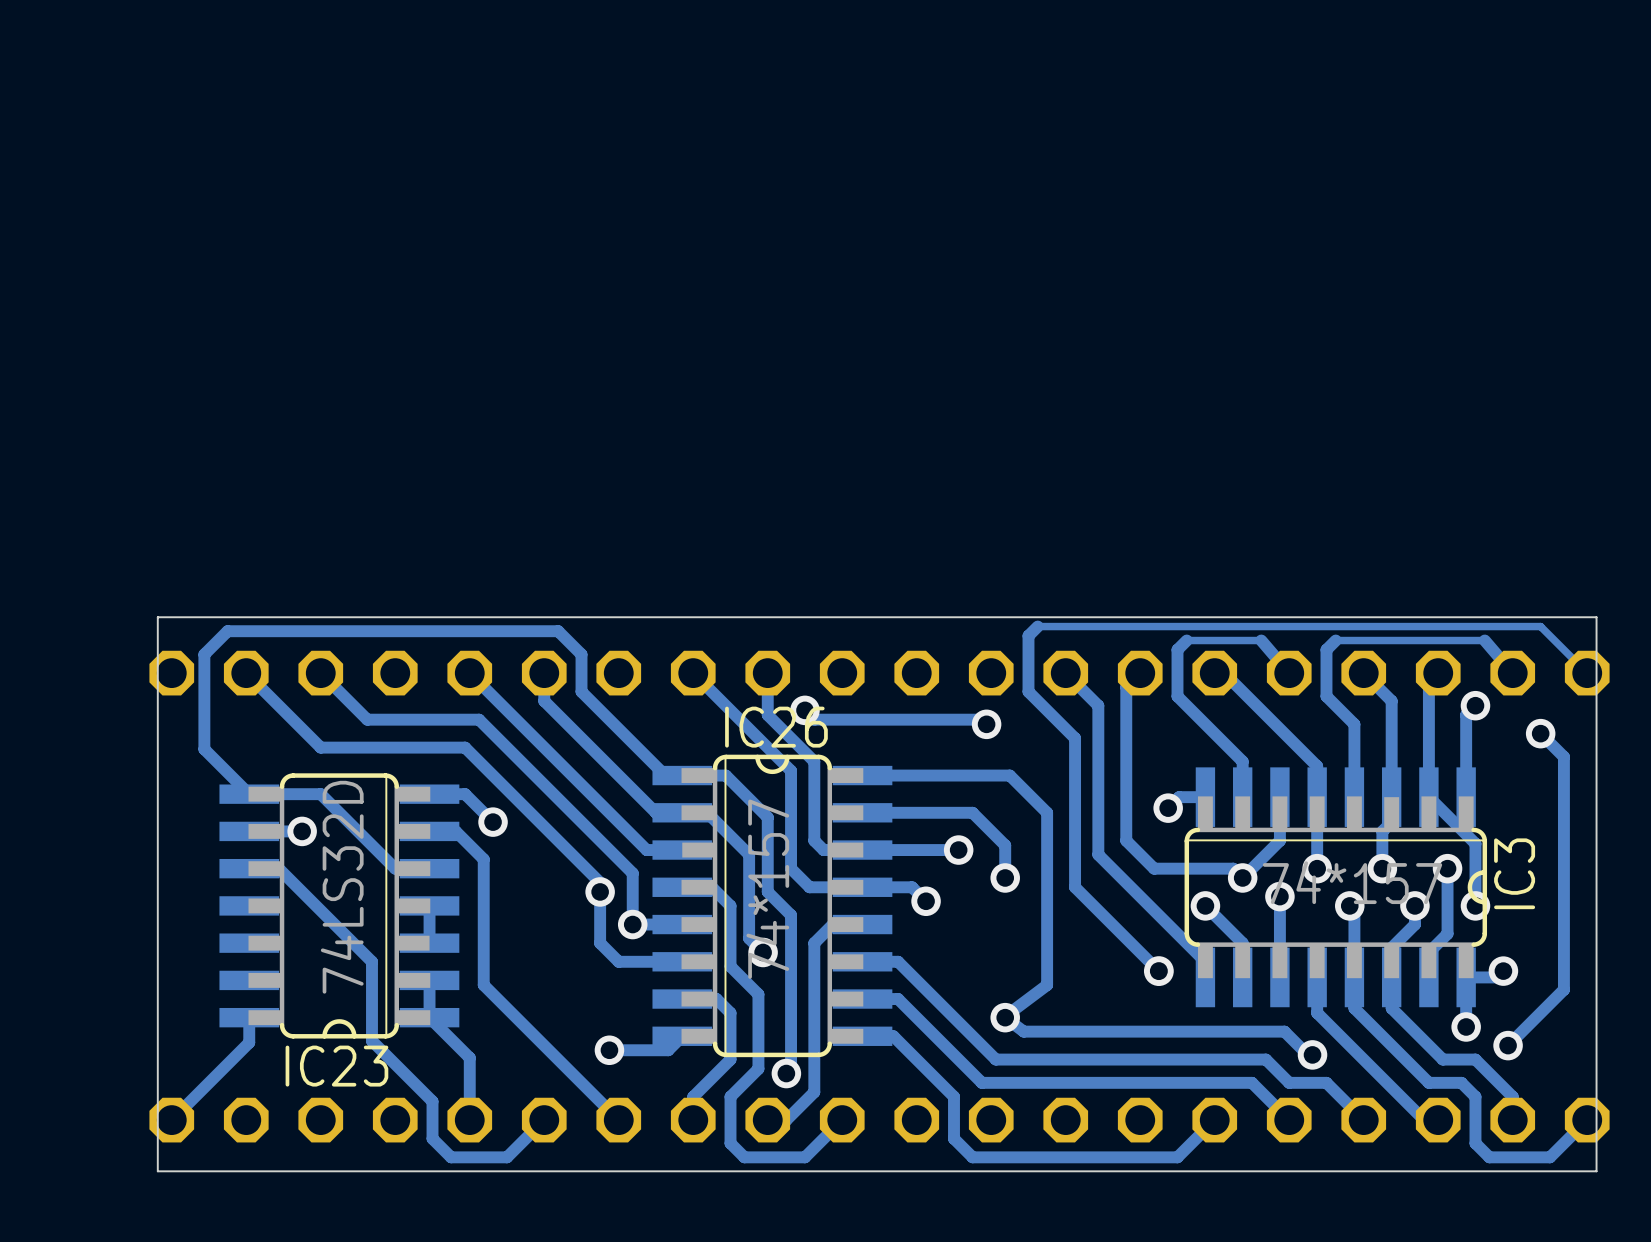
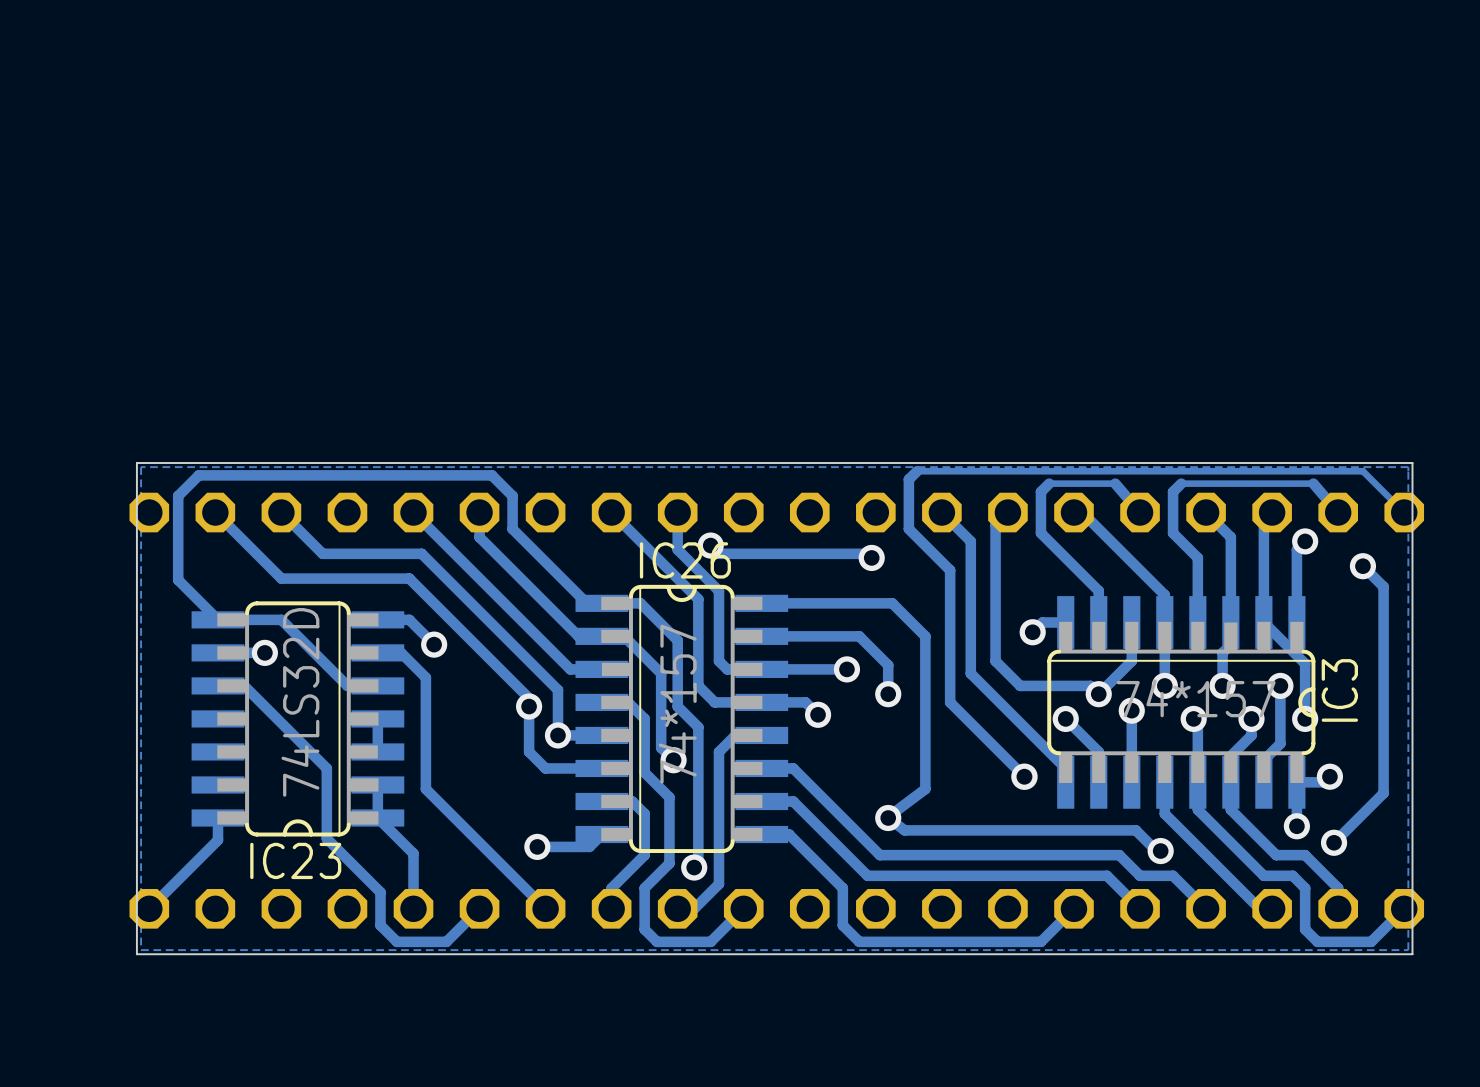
zone outline: none -> (1408, 467) (141, 467) (141, 950) (1408, 950) (1408, 467)

